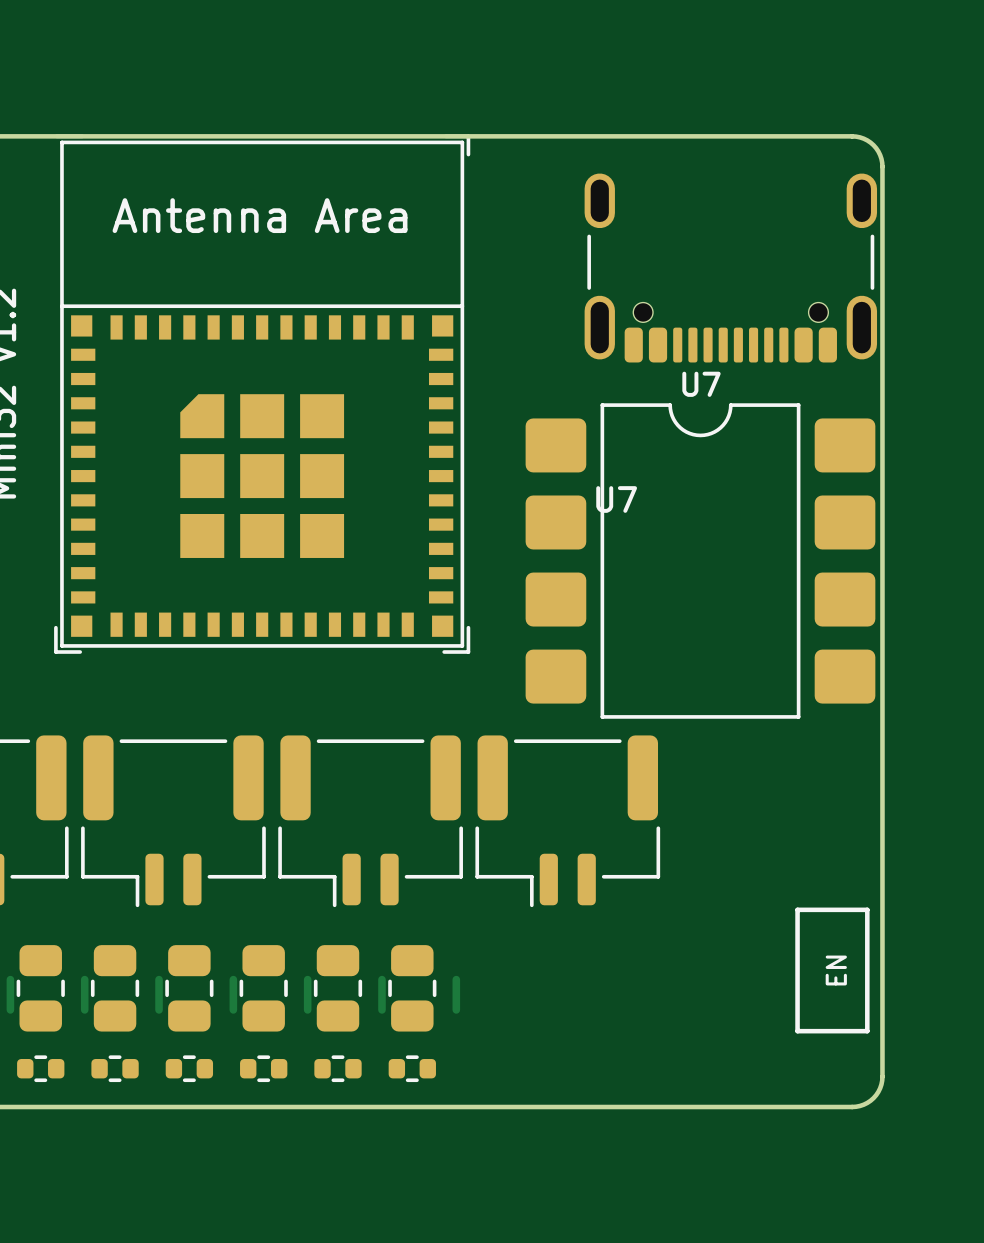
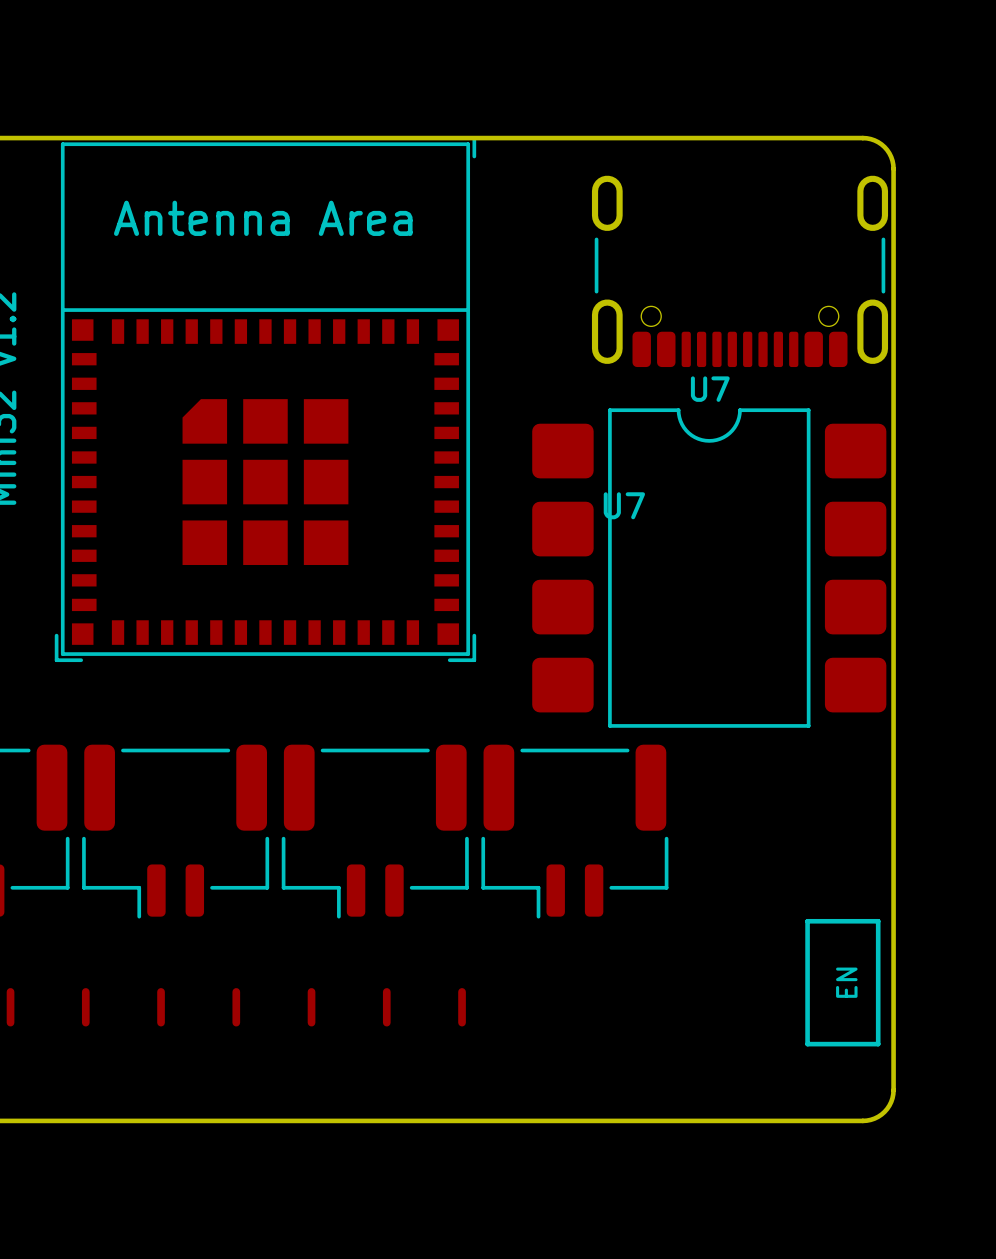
part: (40, 988) -> none
part: (115, 988) -> none
part: (189, 988) -> none
part: (263, 988) -> none
part: (338, 988) -> none
part: (412, 988) -> none
part: (40, 1068) -> none
part: (115, 1068) -> none
part: (189, 1068) -> none
part: (263, 1068) -> none
part: (338, 1068) -> none
part: (412, 1068) -> none

